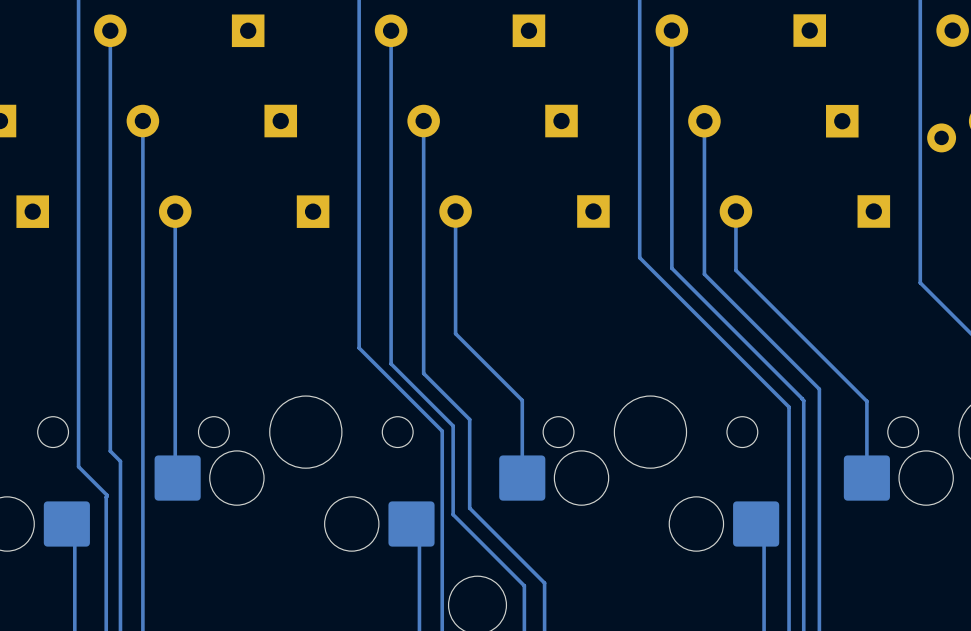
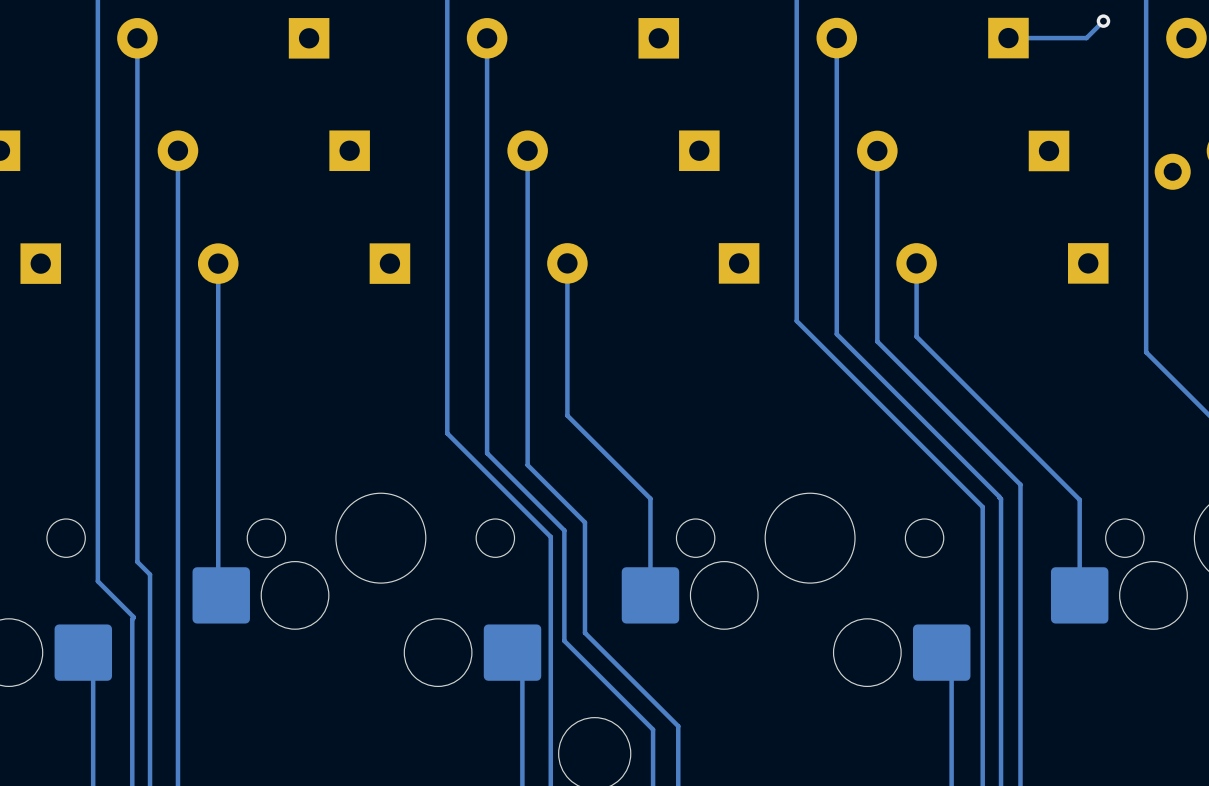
track: none -> (1103, 21) (1086, 38) (1008, 38)
via: none -> (1103, 21)

